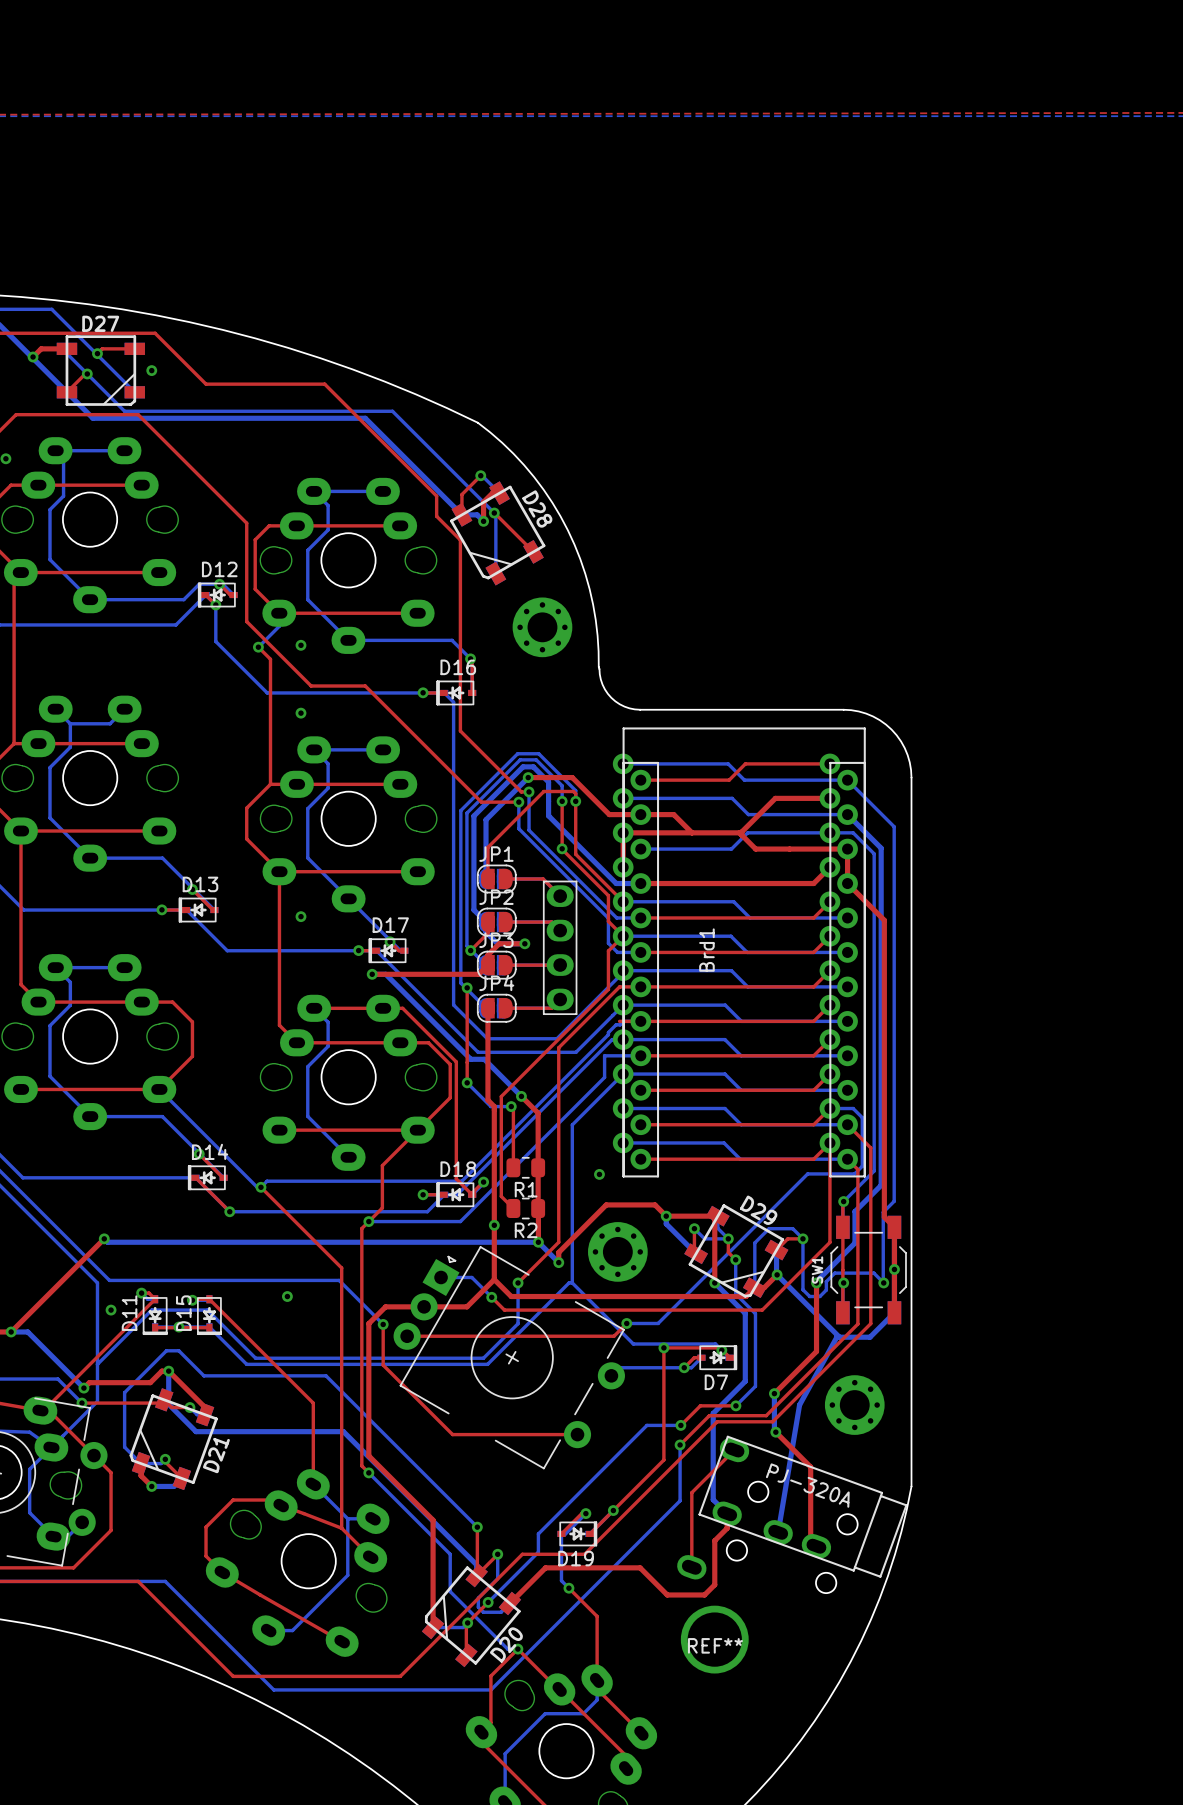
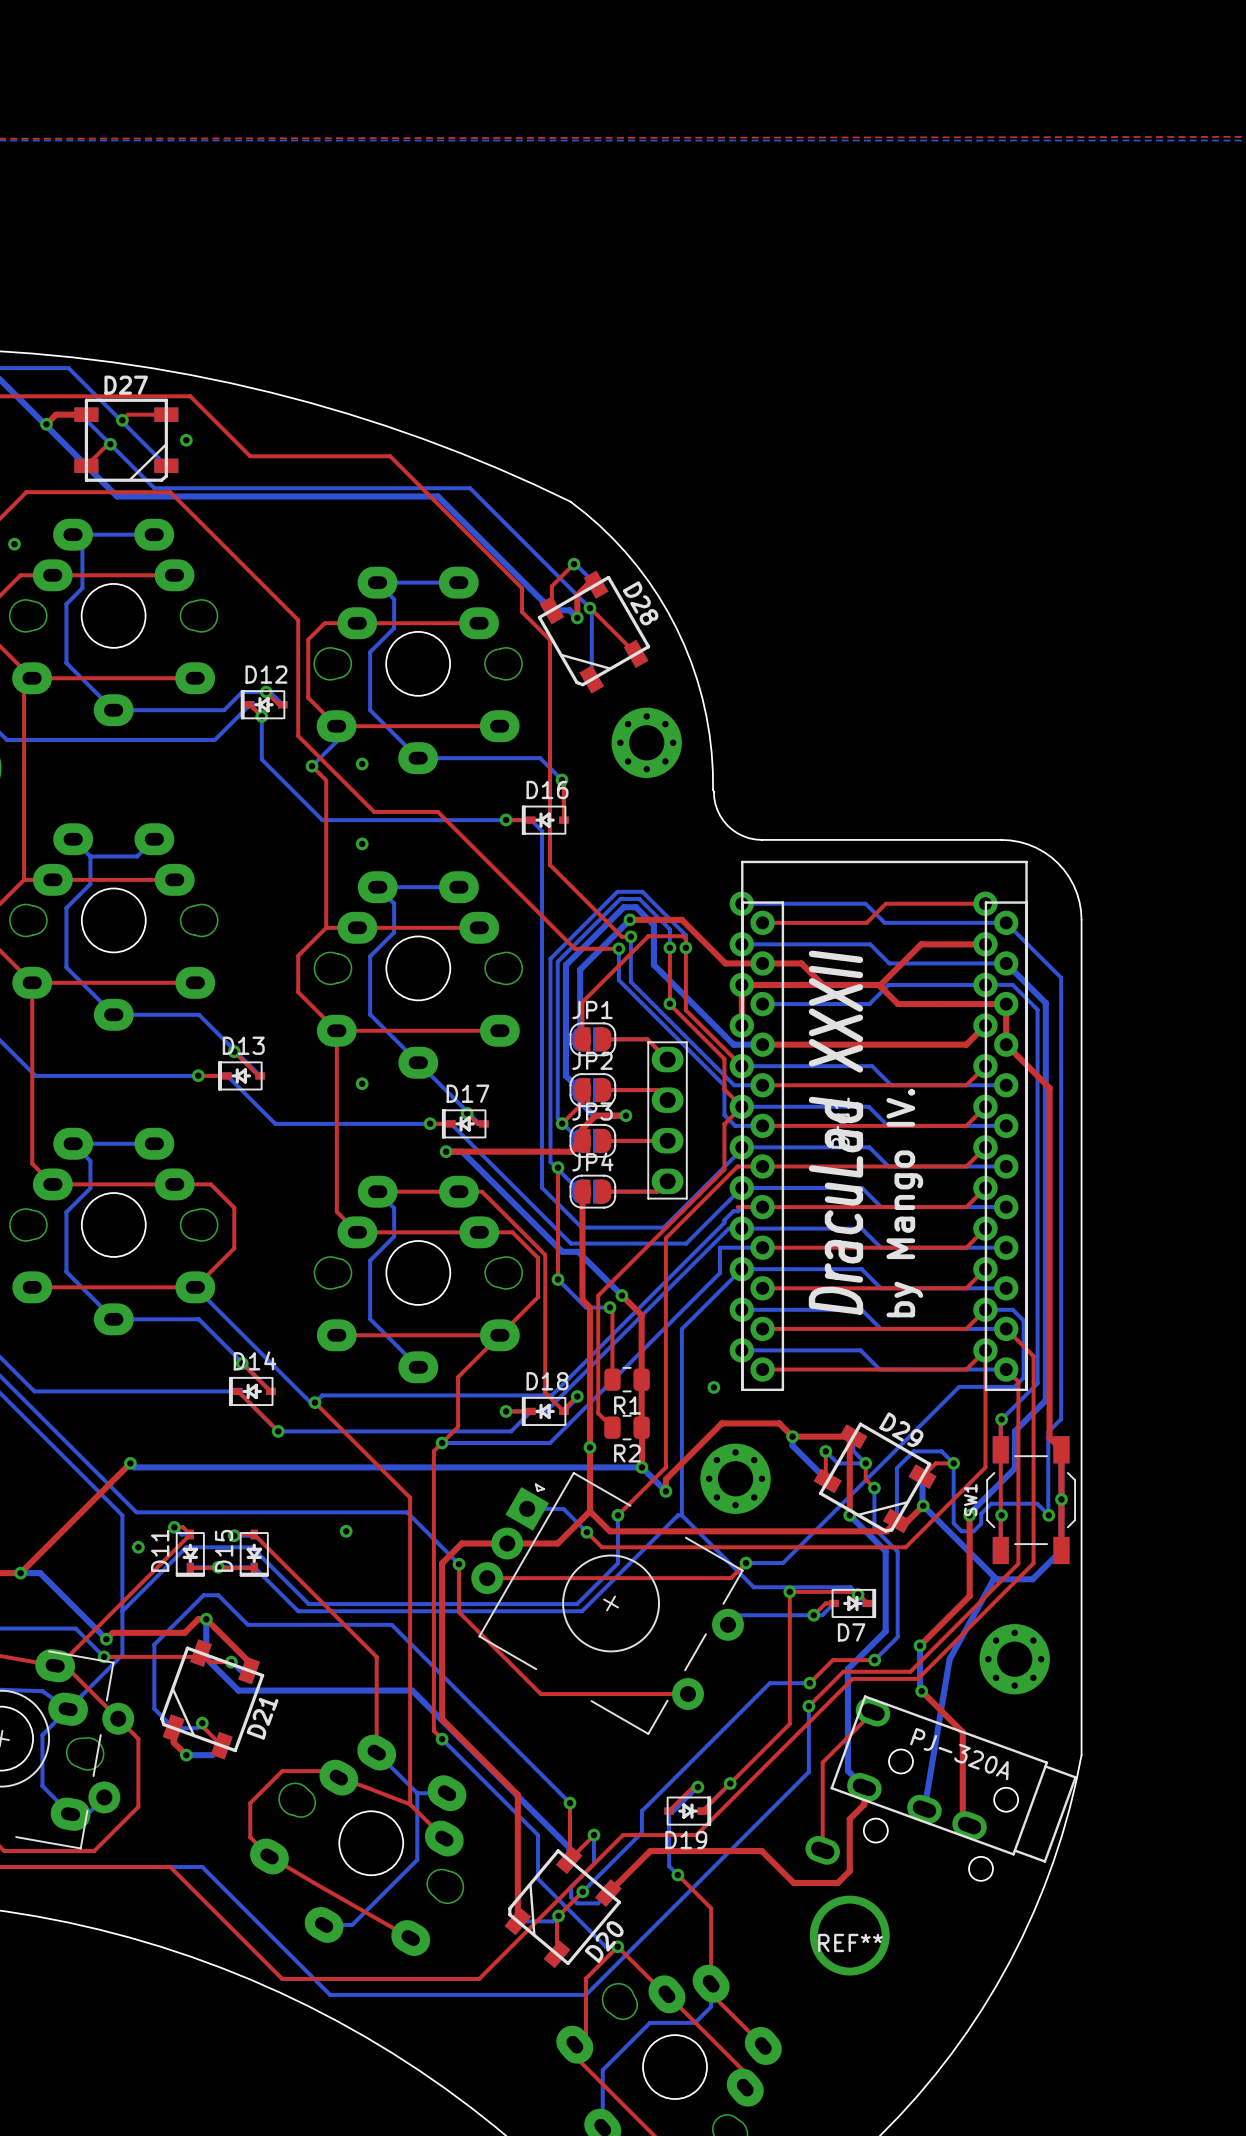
text: none -> DracuLad XXXII (835, 1132)
text: none -> by Mango IV. (904, 1203)

